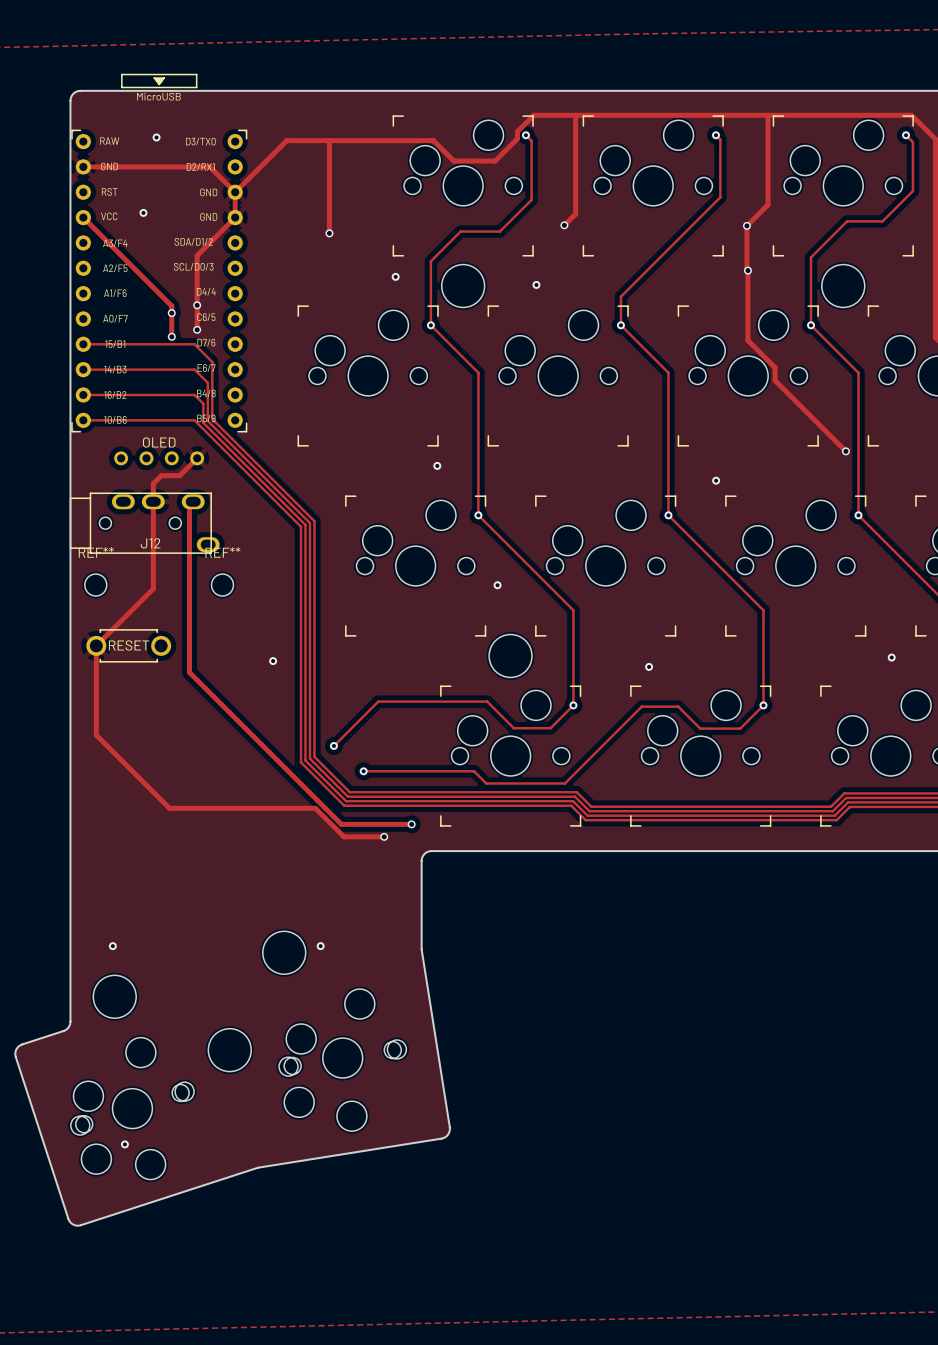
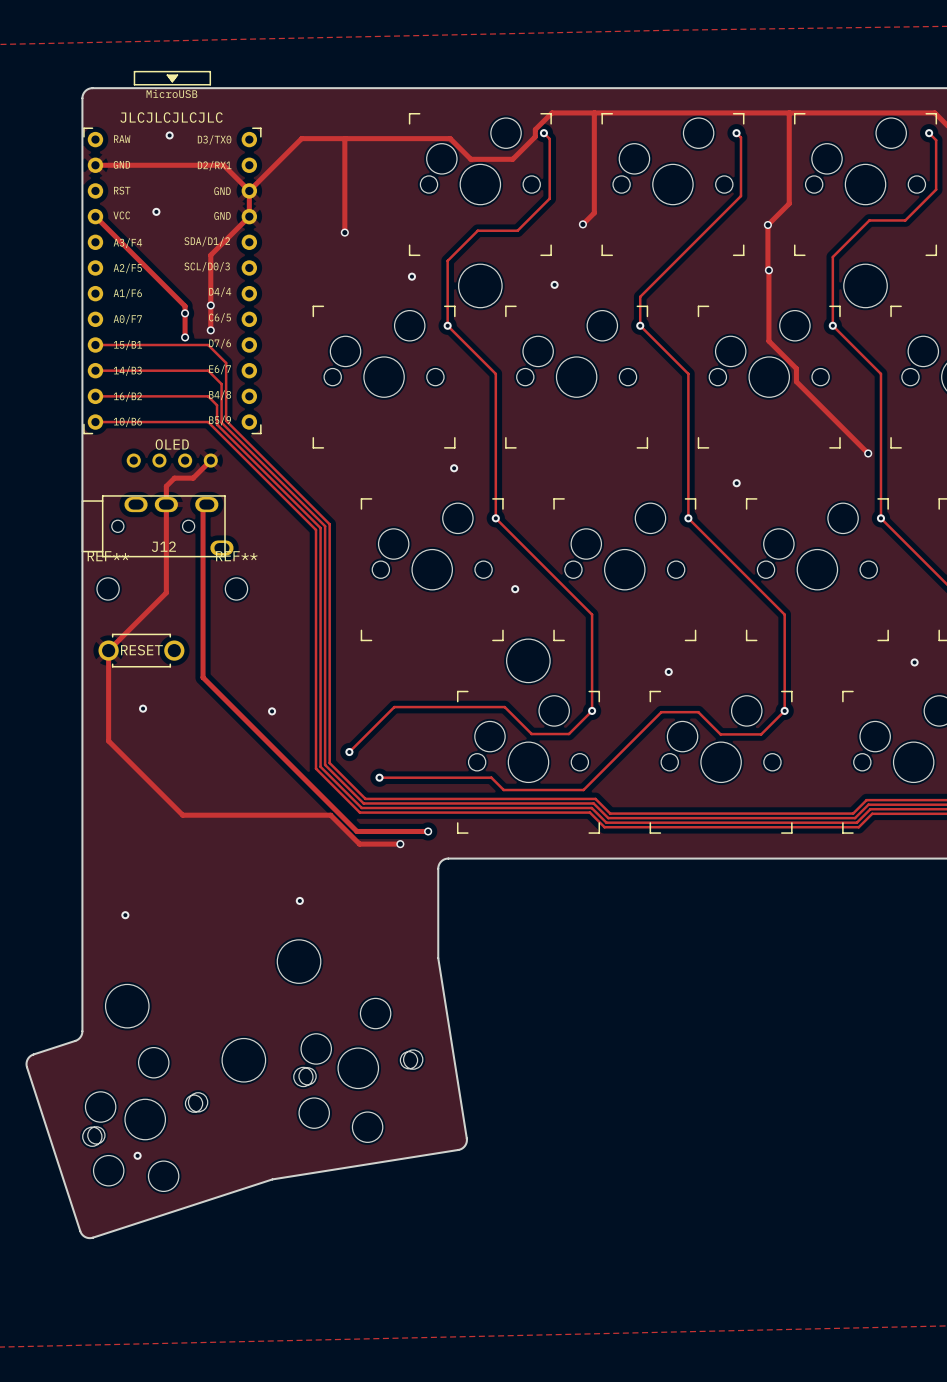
text: none -> JLCJLCJLCJLC (171, 117)
via position: (273, 661) -> (272, 711)
via: none -> (143, 708)
via: none -> (299, 900)
via position: (112, 946) -> (125, 915)
via: (320, 946) -> none

